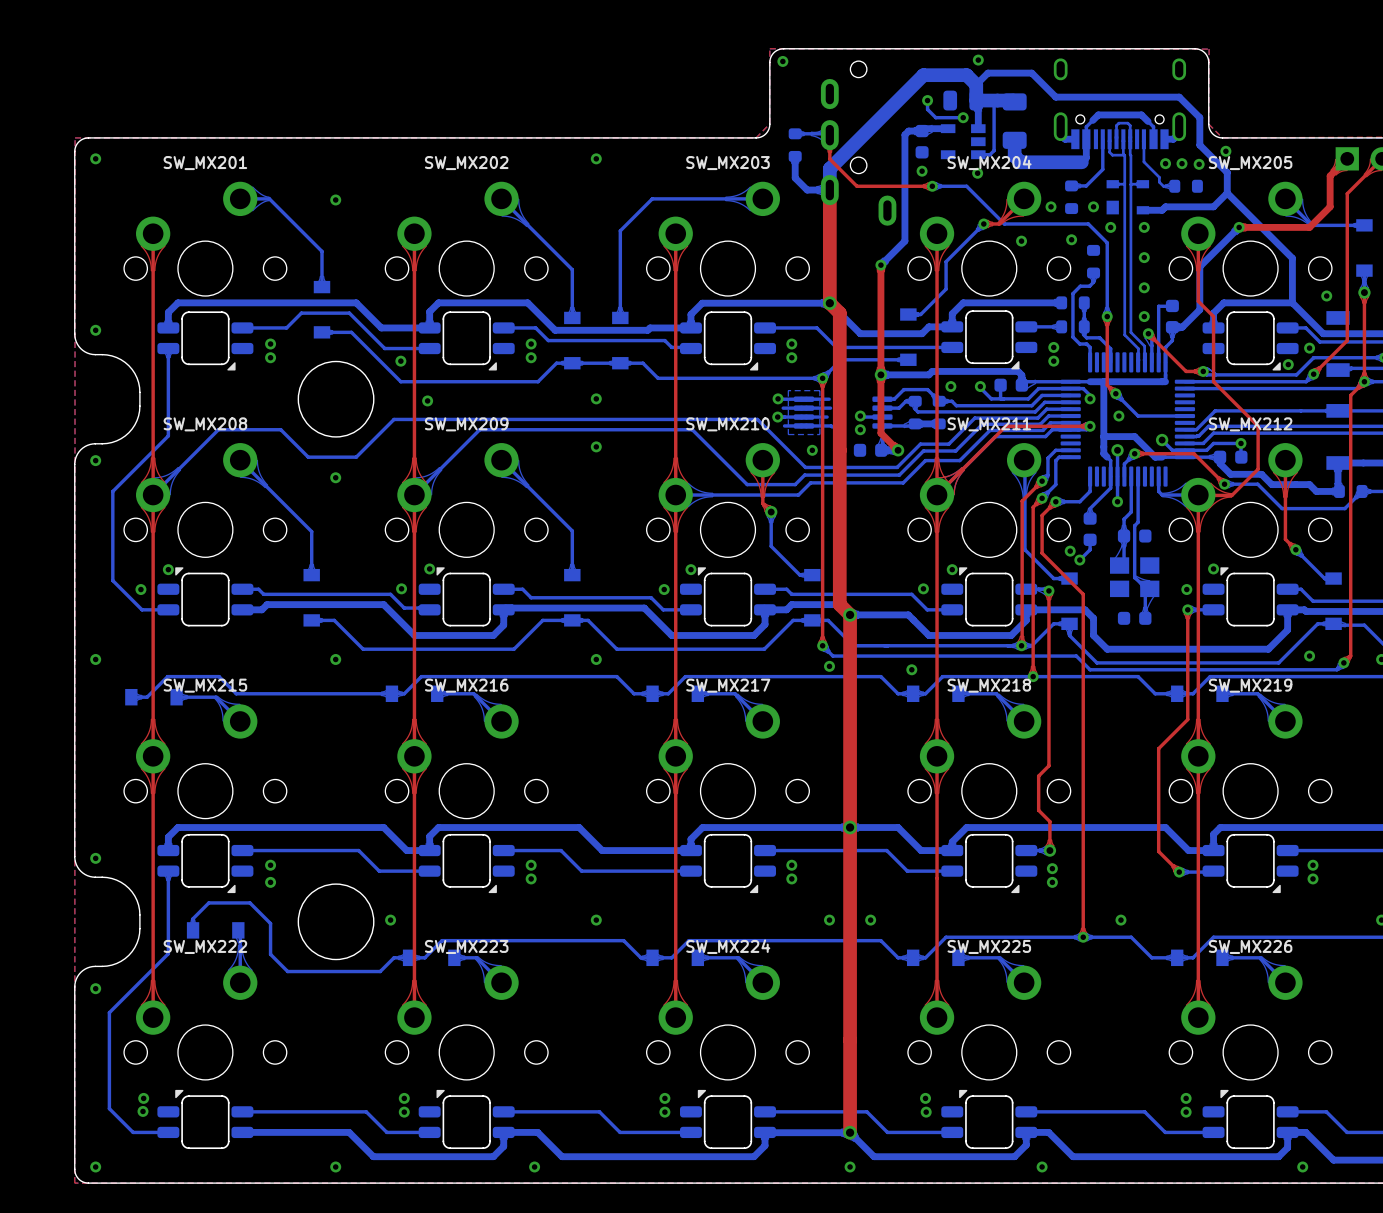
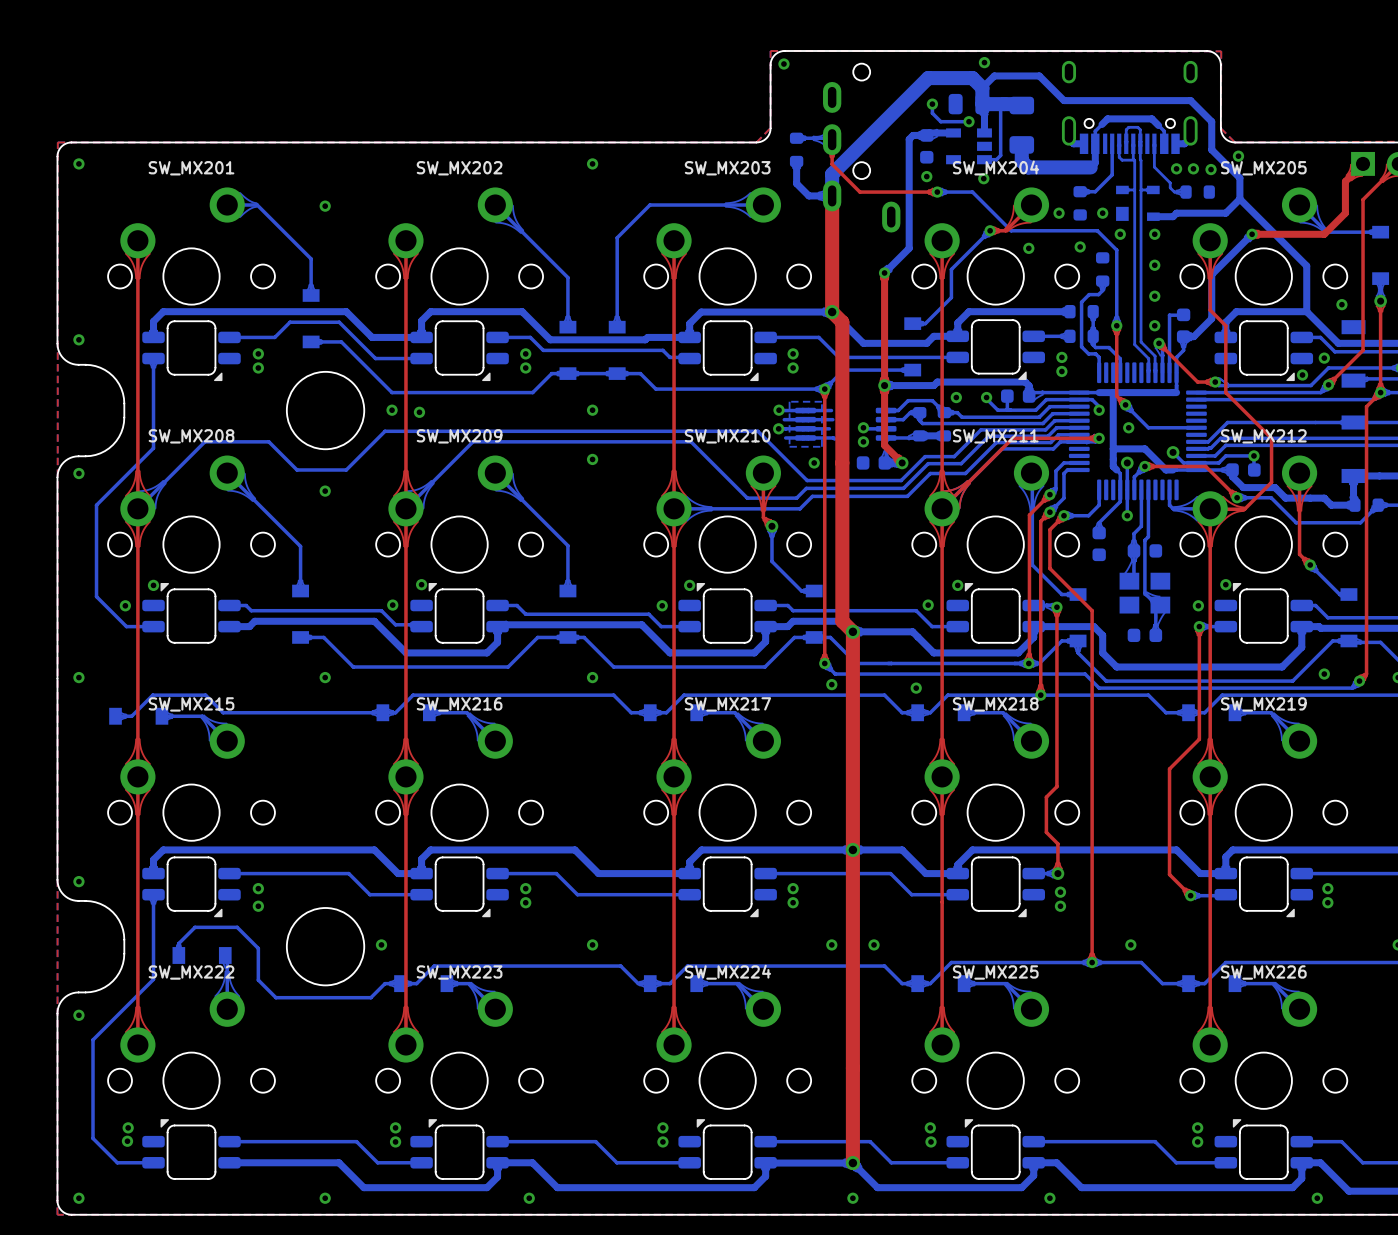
via position: (400, 361) -> (392, 410)
bottom track: (1090, 539) (1090, 549) (1079, 560) -> none
via: (1070, 551) -> none
via: (1079, 560) -> none

